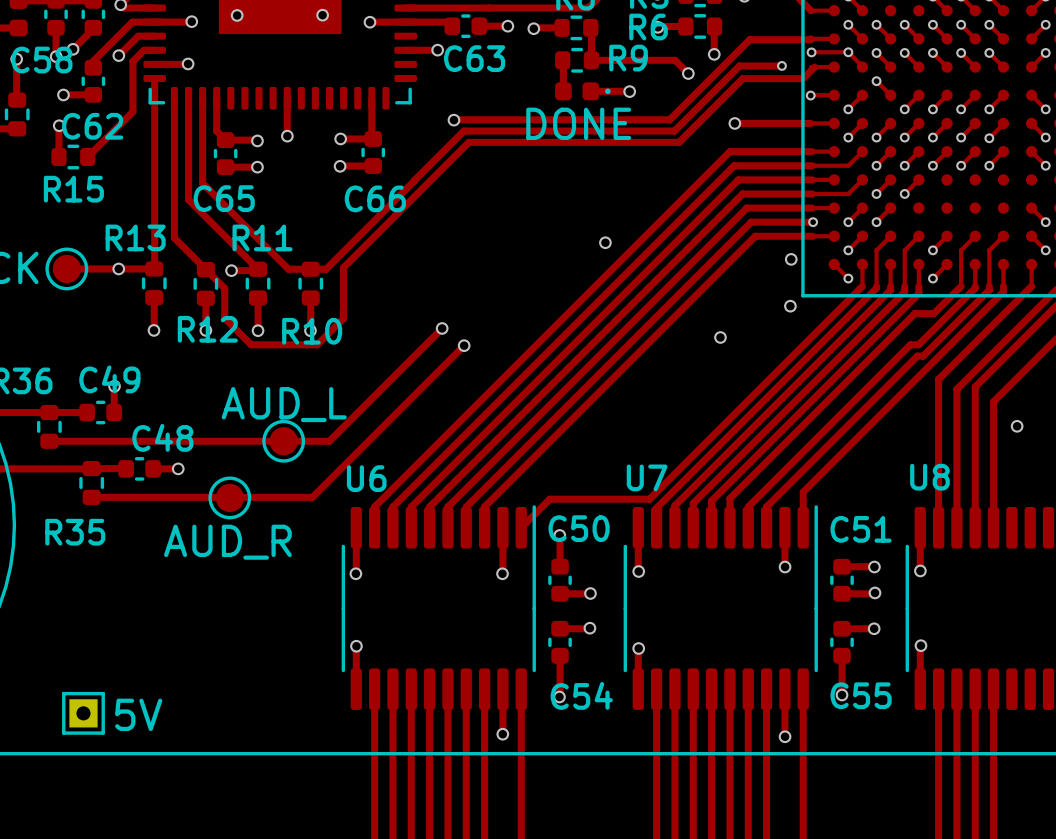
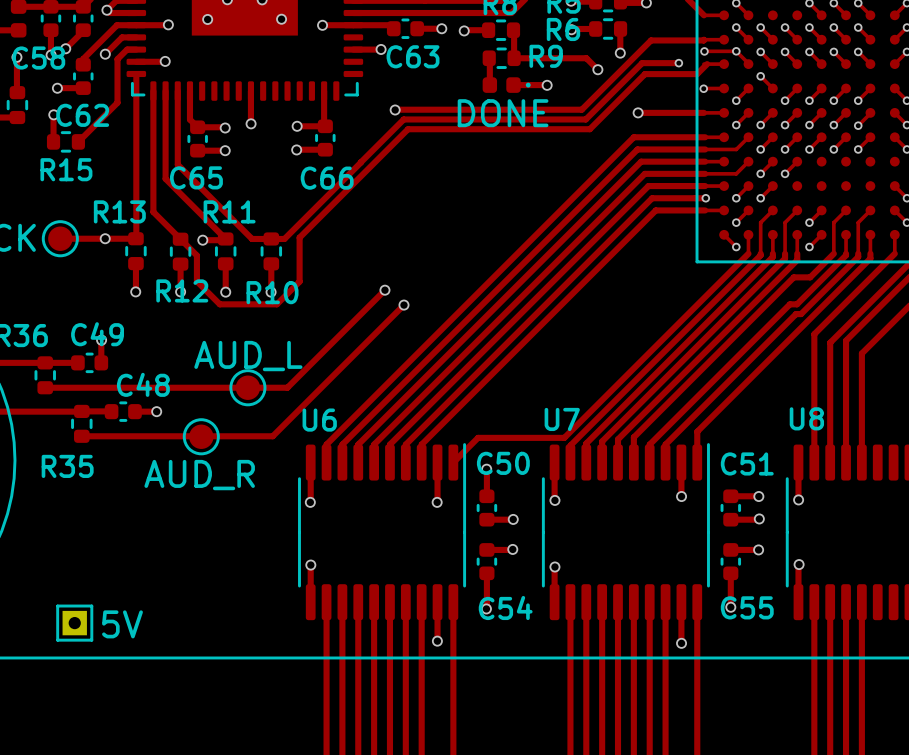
via: (605, 242) -> none
via: (791, 259) -> none
via: (790, 306) -> none
via: (720, 337) -> none
via: (1017, 426) -> none

